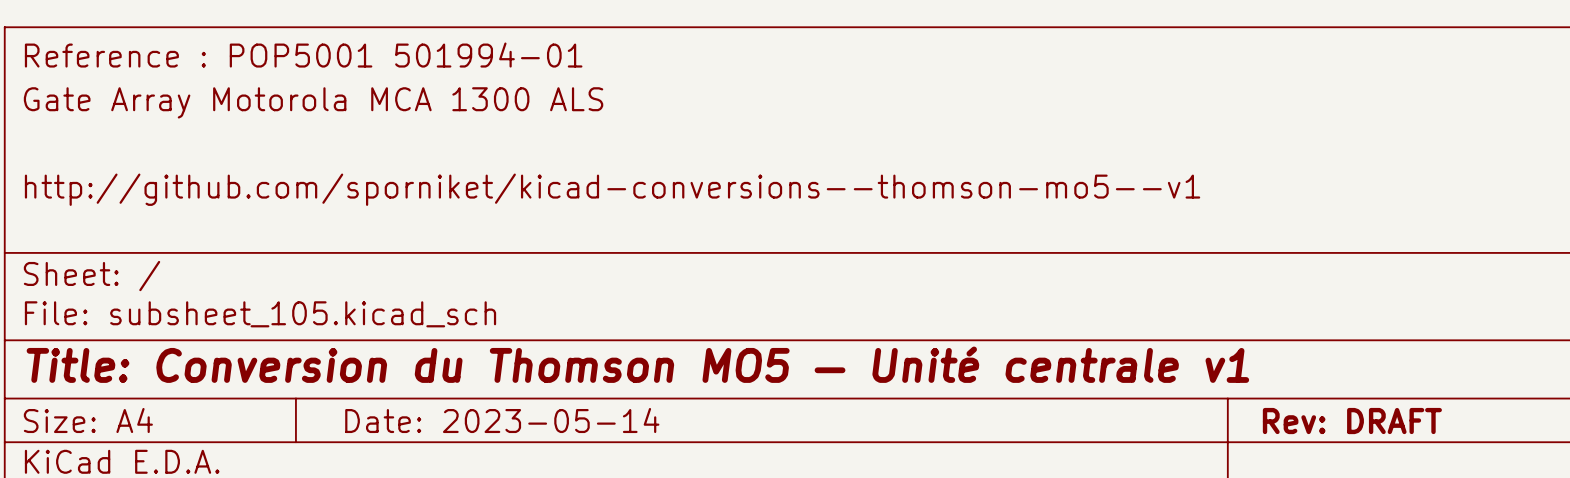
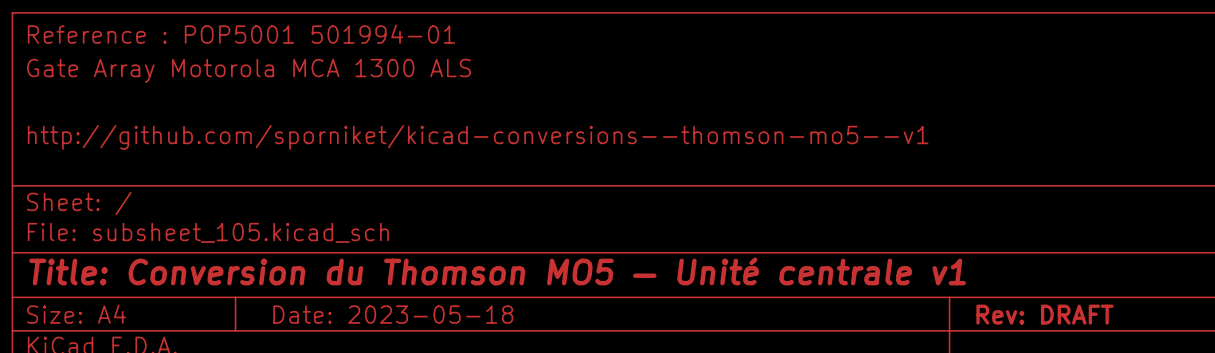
title block: Date: 2023-05-14 (502, 420) -> Date: 2023-05-18 (393, 314)

